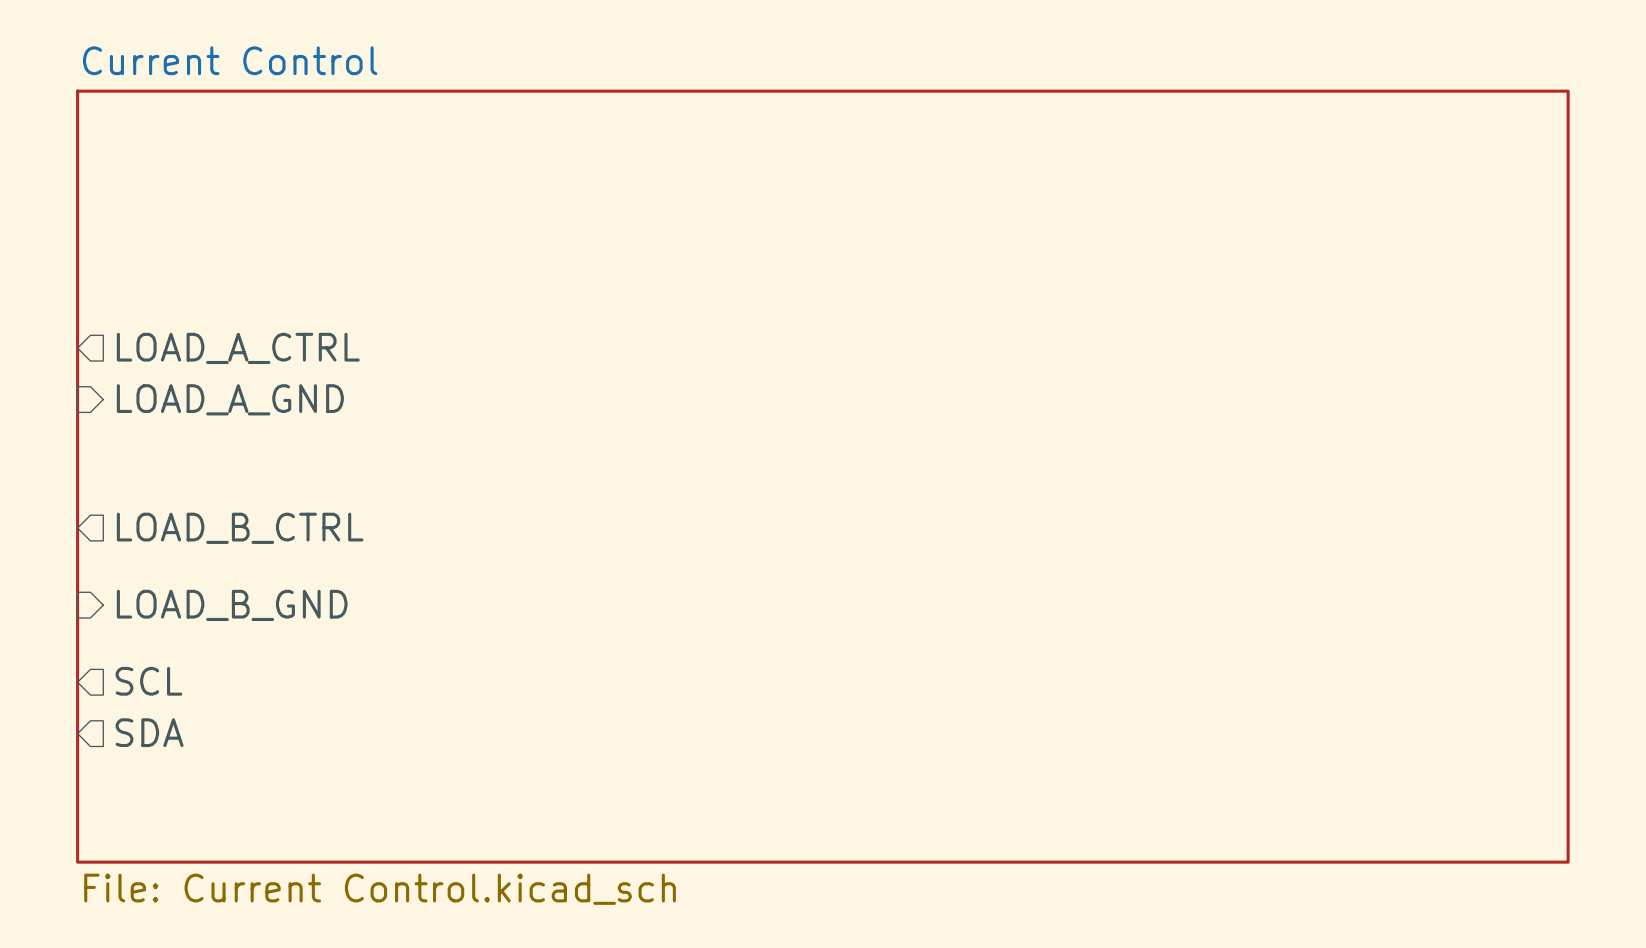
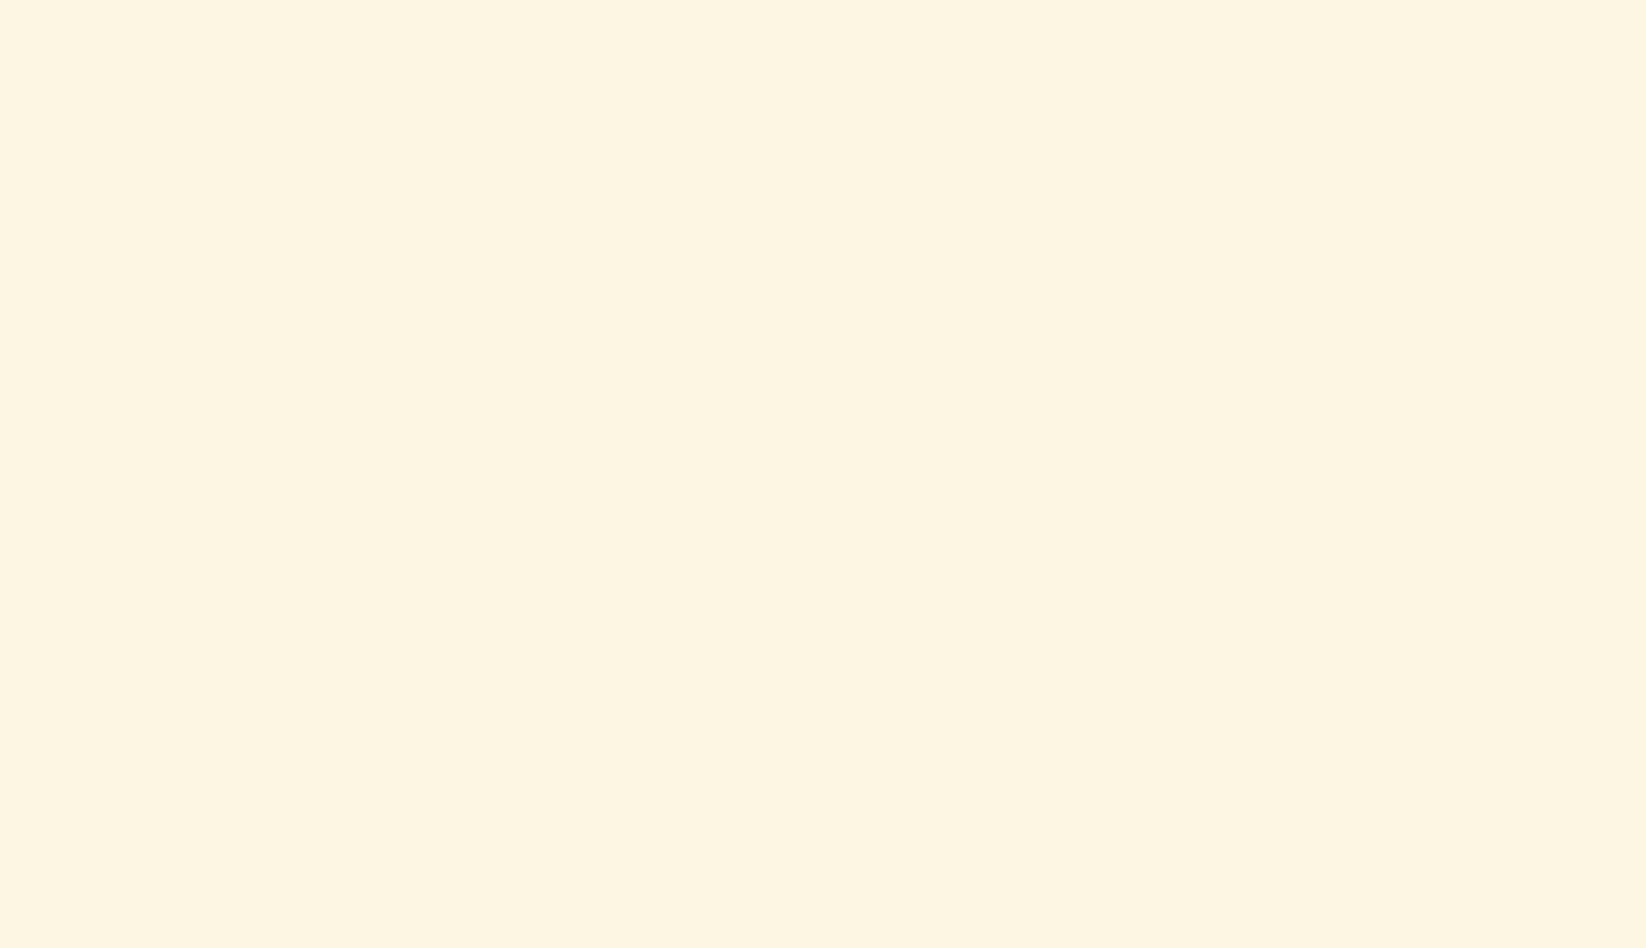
sheet pin: LOAD_A_CTRL (238, 348) -> none
sheet pin: LOAD_A_GND (230, 399) -> none
sheet Current Control: File: Current Control.kicad_sch (822, 476) -> none
sheet pin: LOAD_B_CTRL (240, 528) -> none
sheet pin: LOAD_B_GND (232, 605) -> none
sheet pin: SCL (148, 681) -> none
sheet pin: SDA (149, 732) -> none

